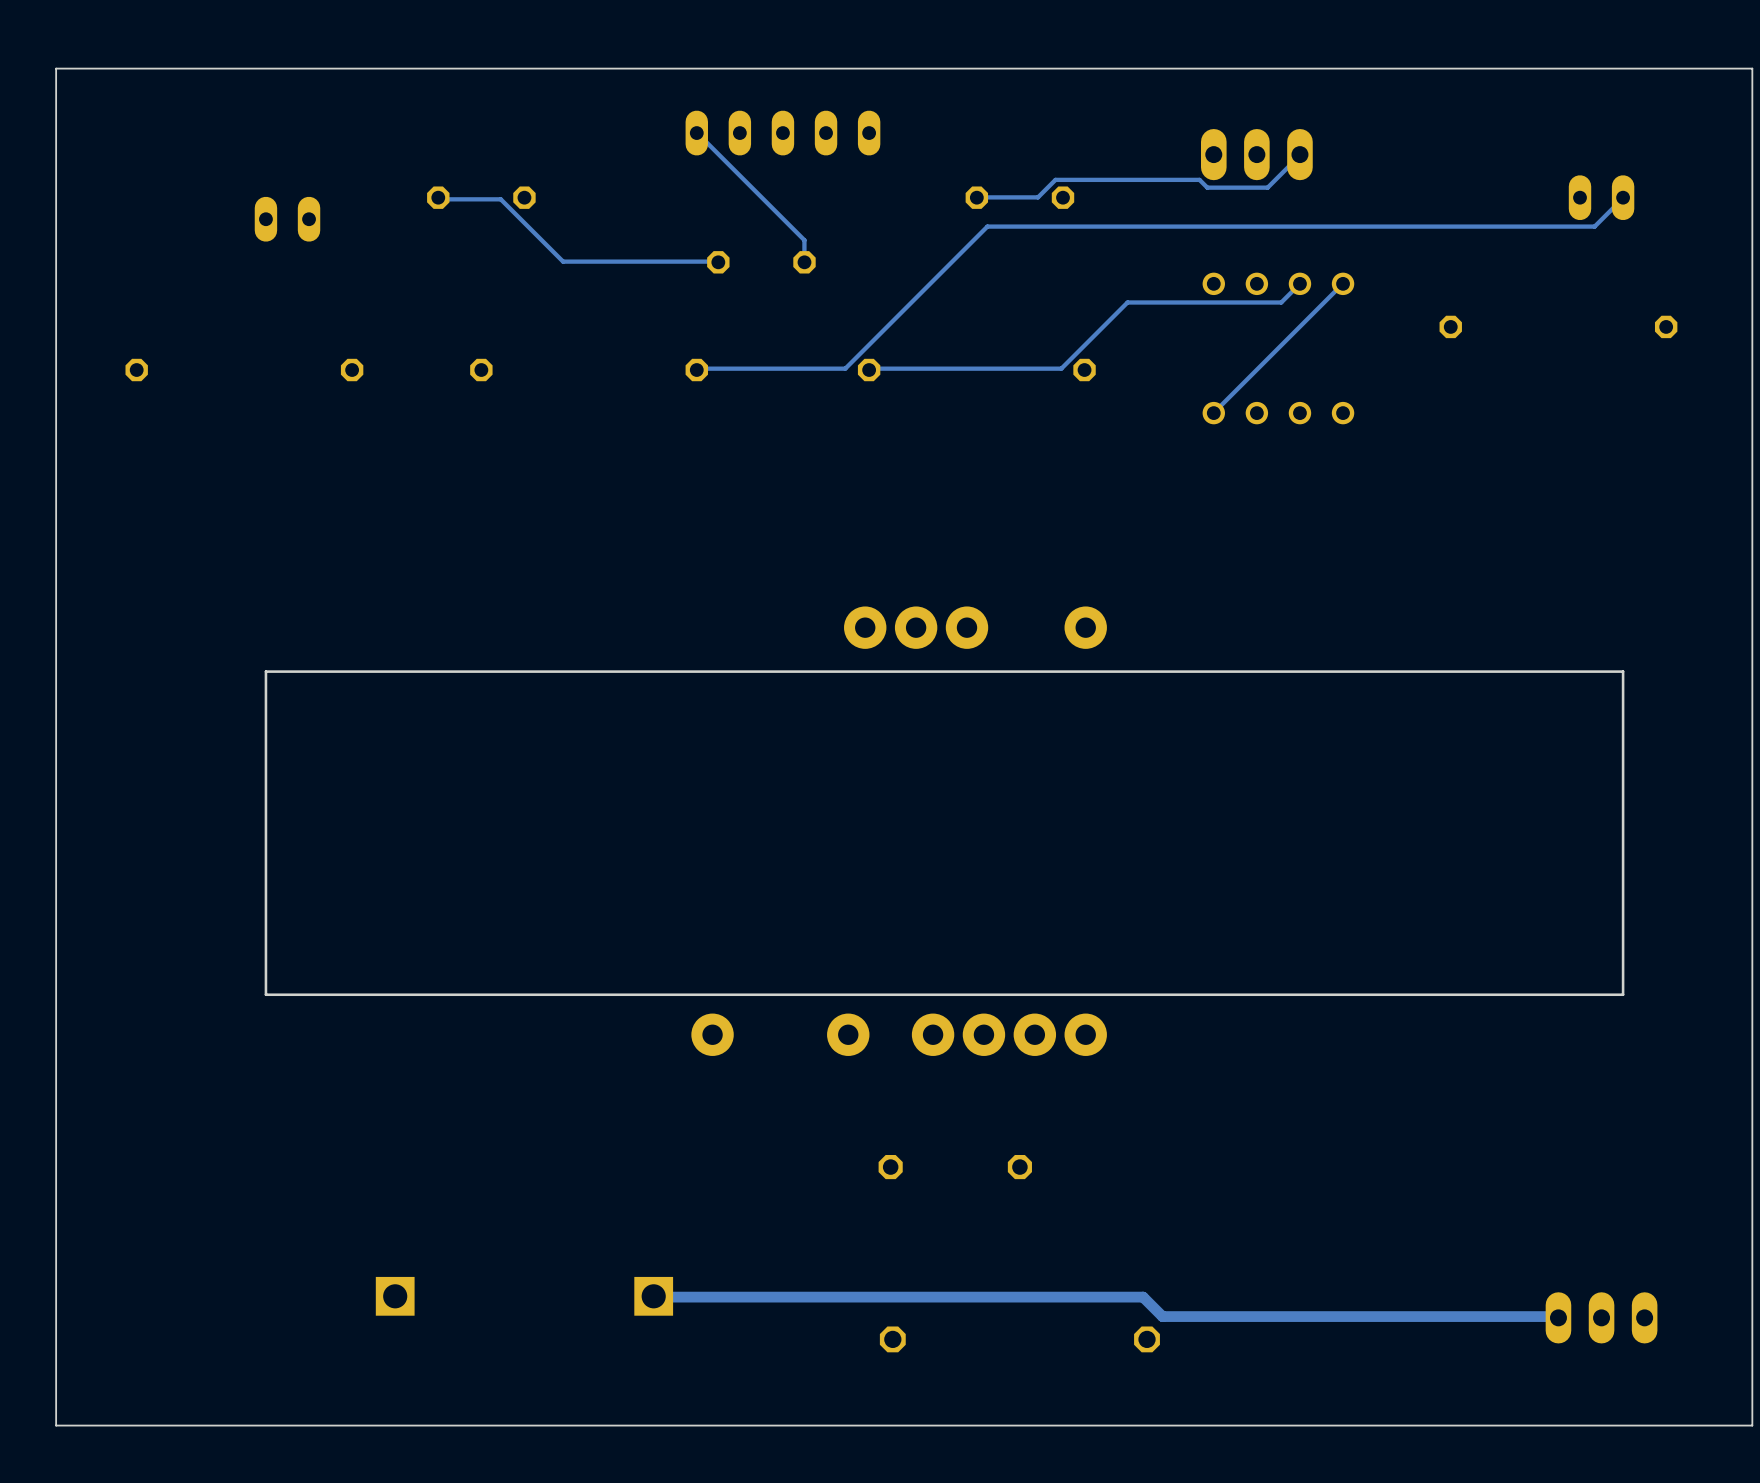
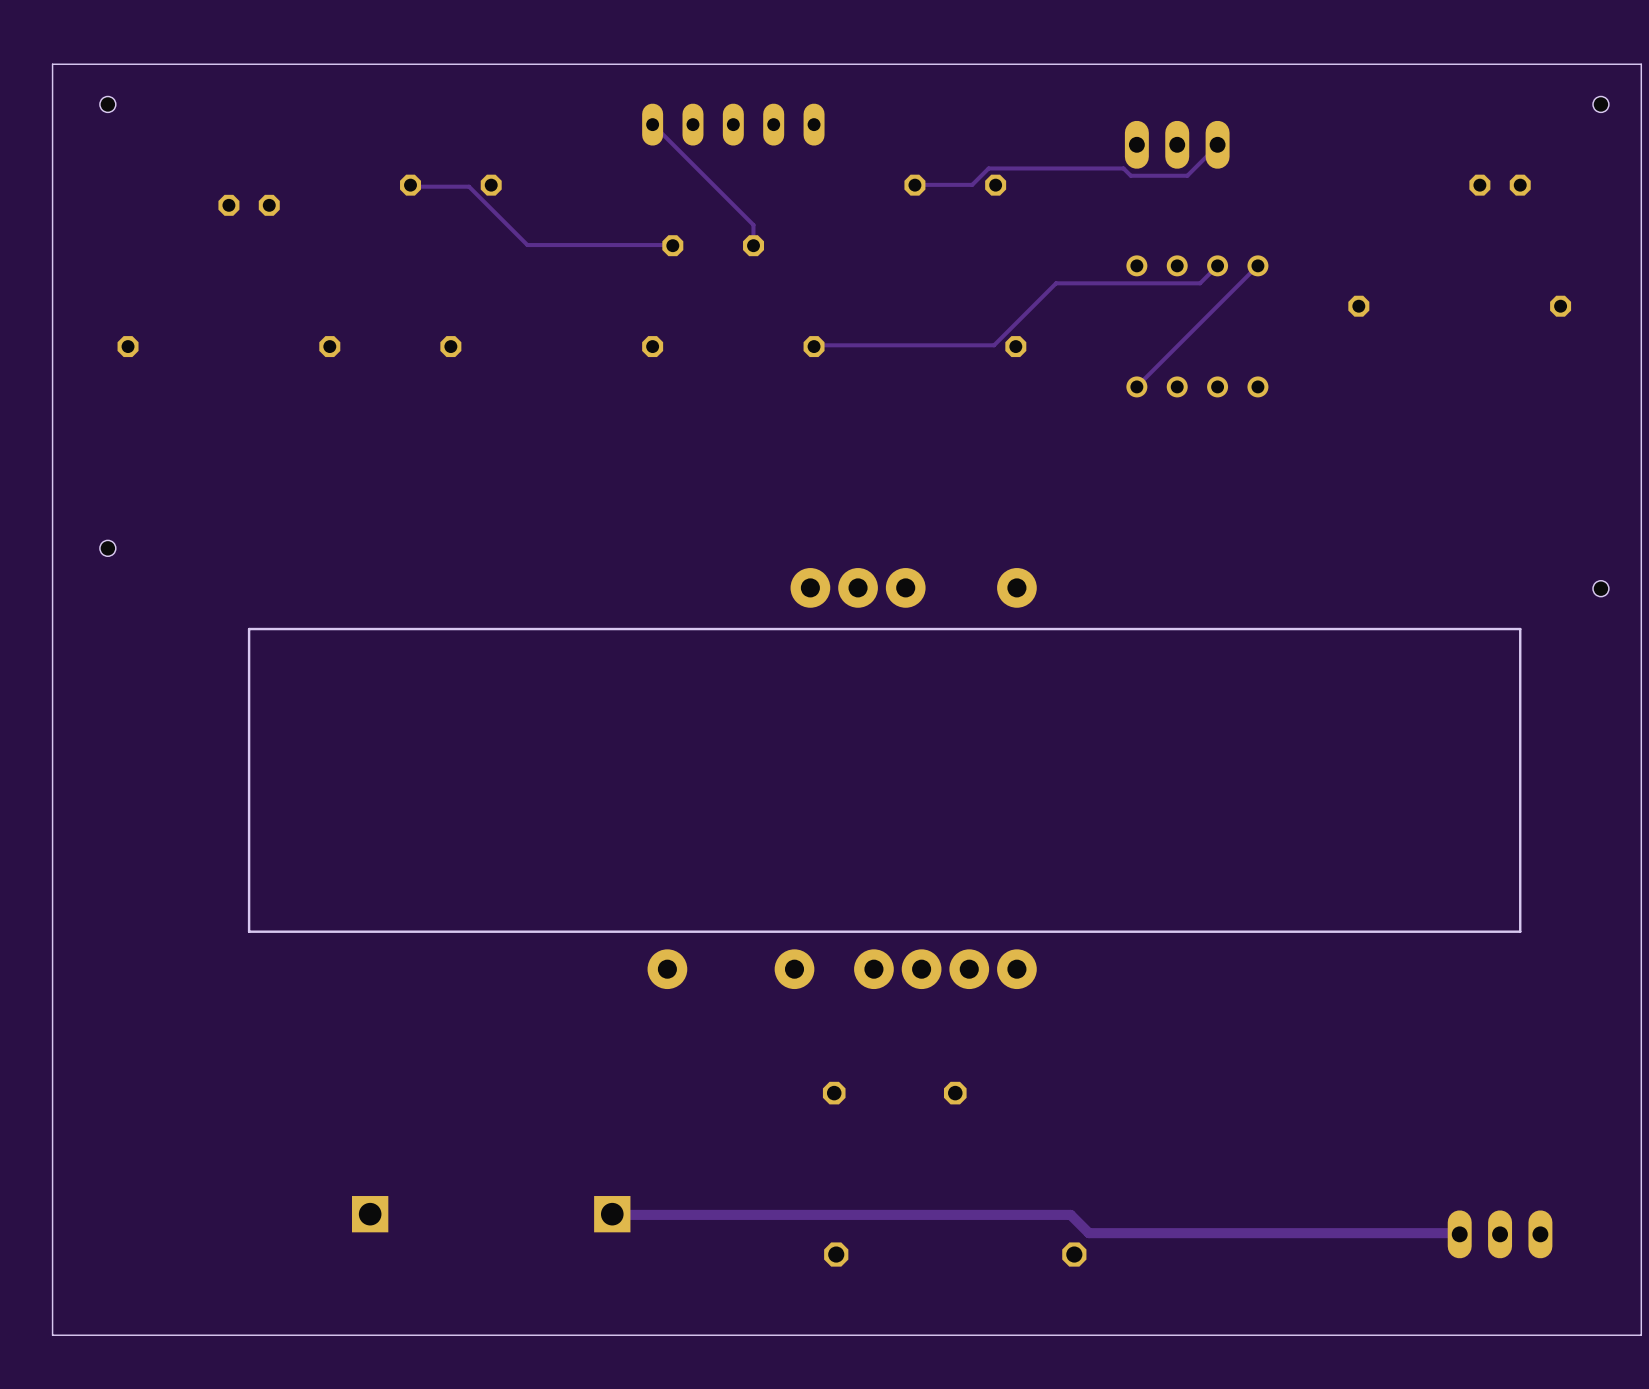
hole: none -> (107, 104)
hole: none -> (1600, 104)
part footprint: [1568, 175, 1635, 221] -> [1469, 174, 1531, 196]
track: (1623, 197) (1594, 226) (987, 226) (845, 368) (696, 370) -> none
part: none -> (249, 205)
part: (287, 219) -> none
hole: none -> (107, 548)
hole: none -> (1600, 588)

